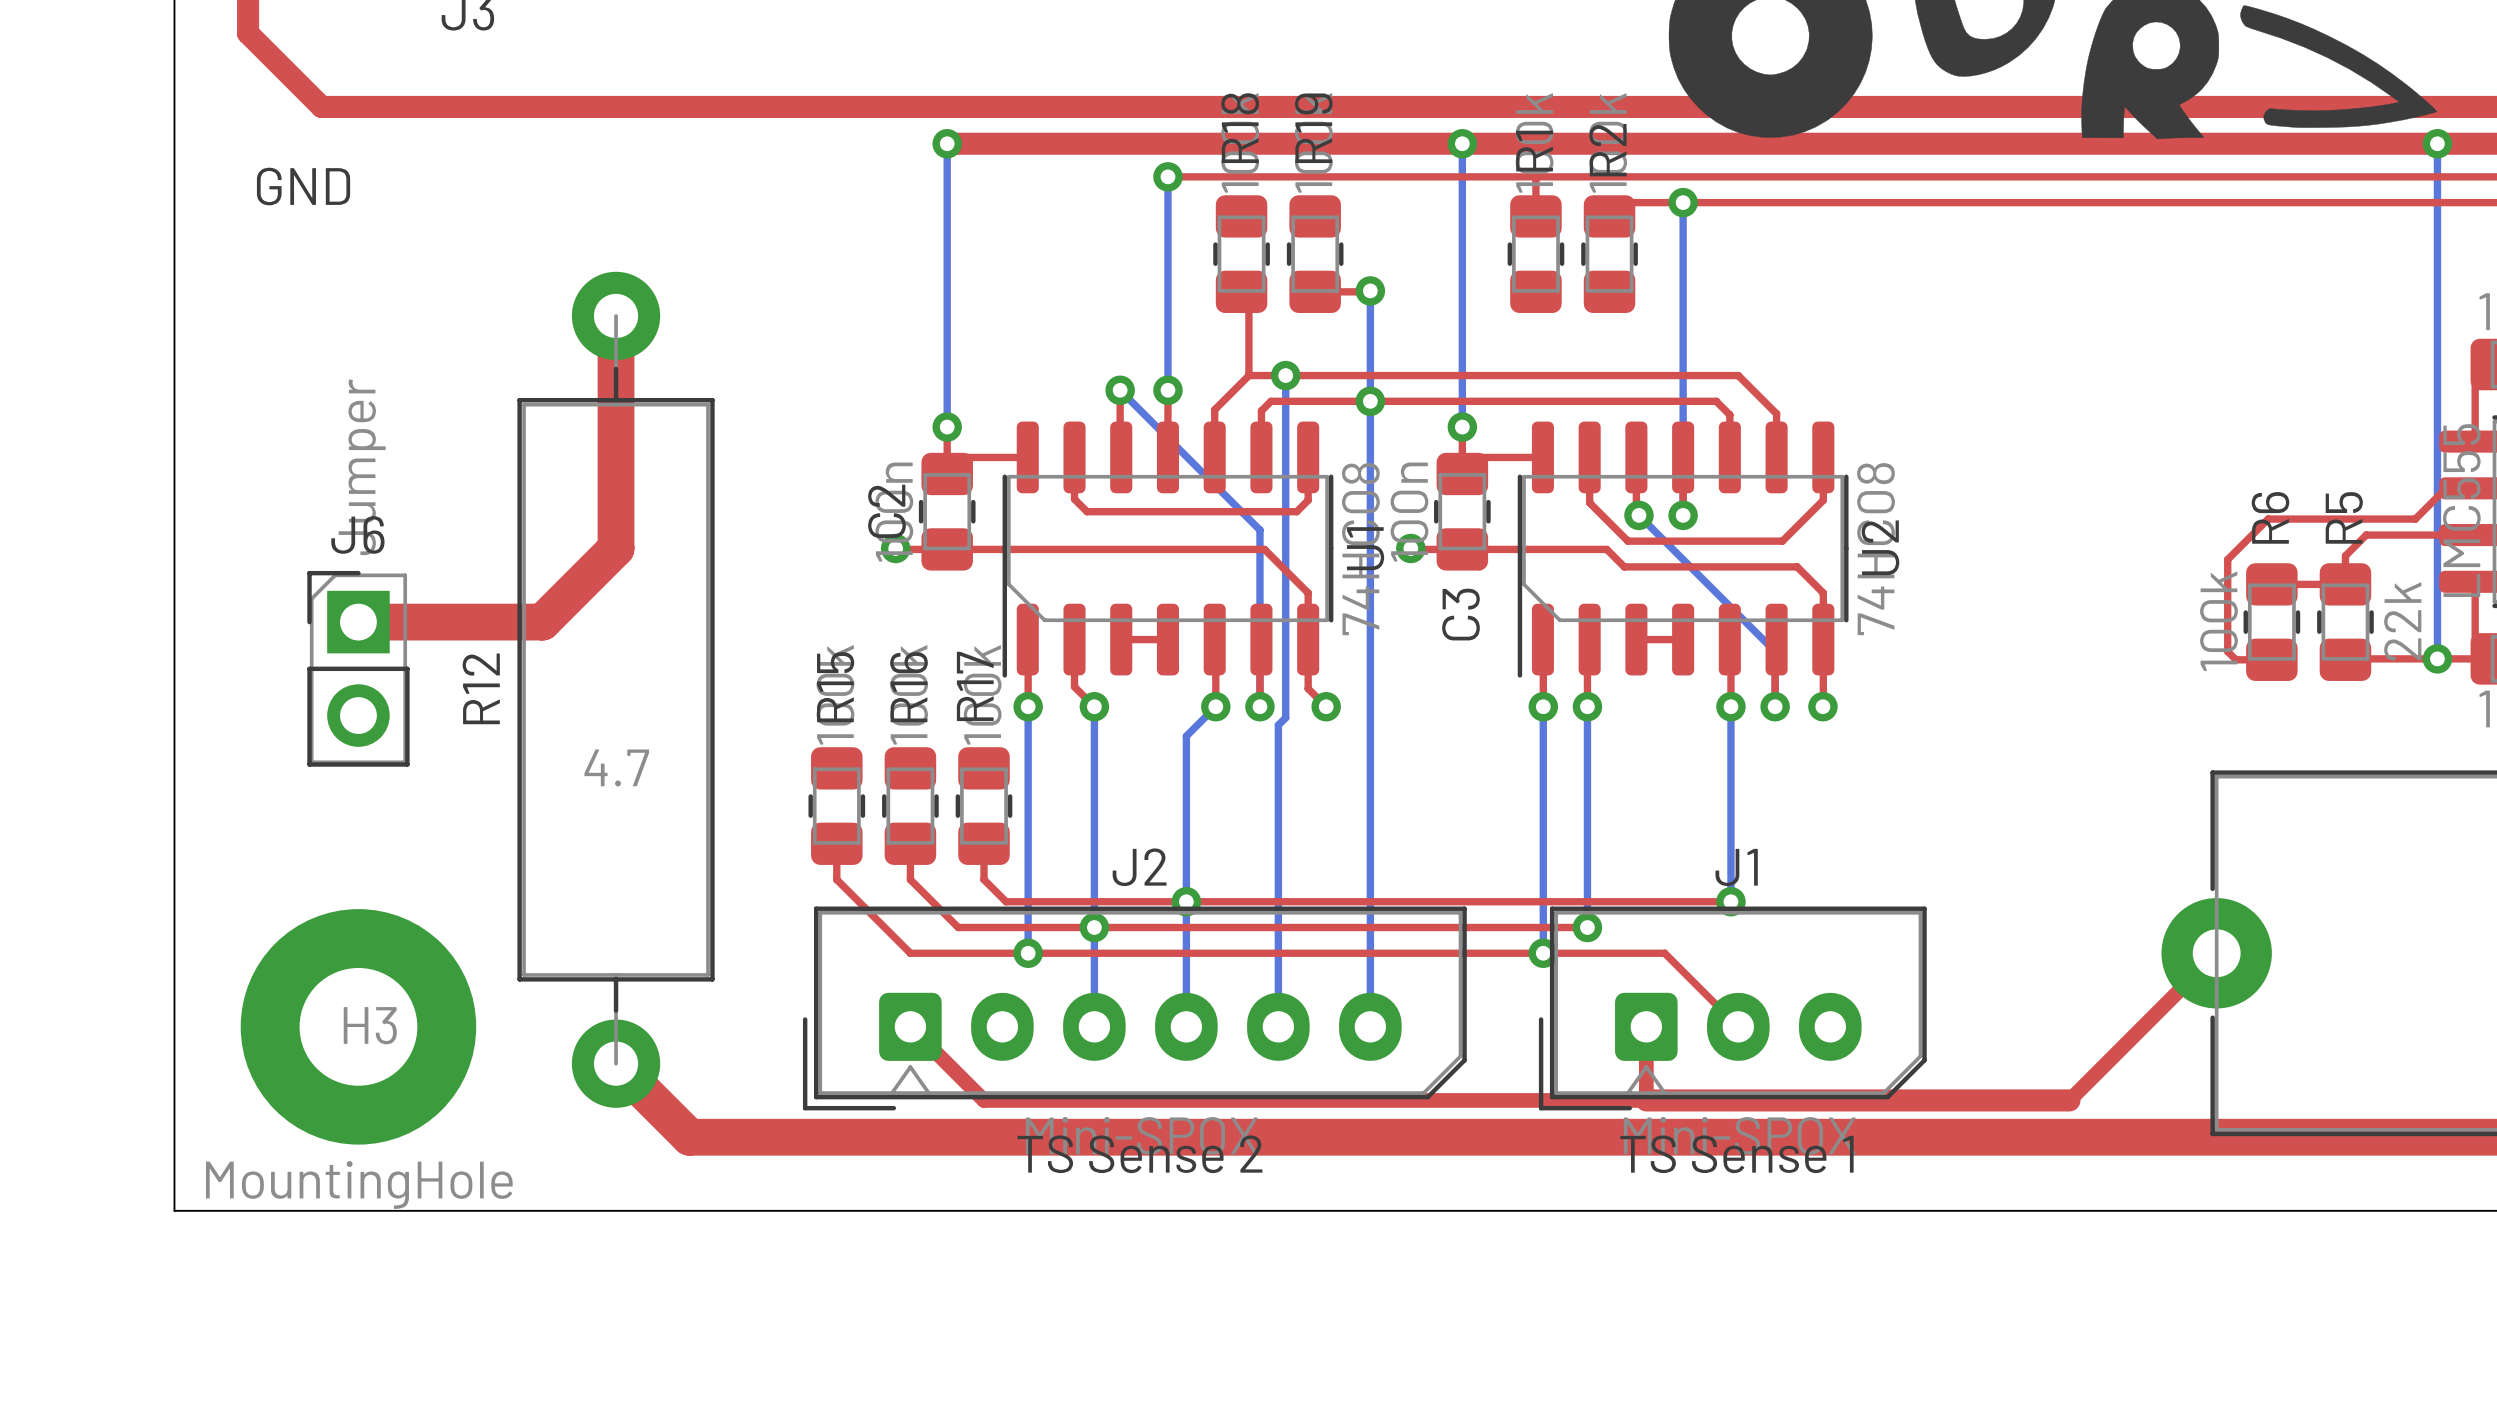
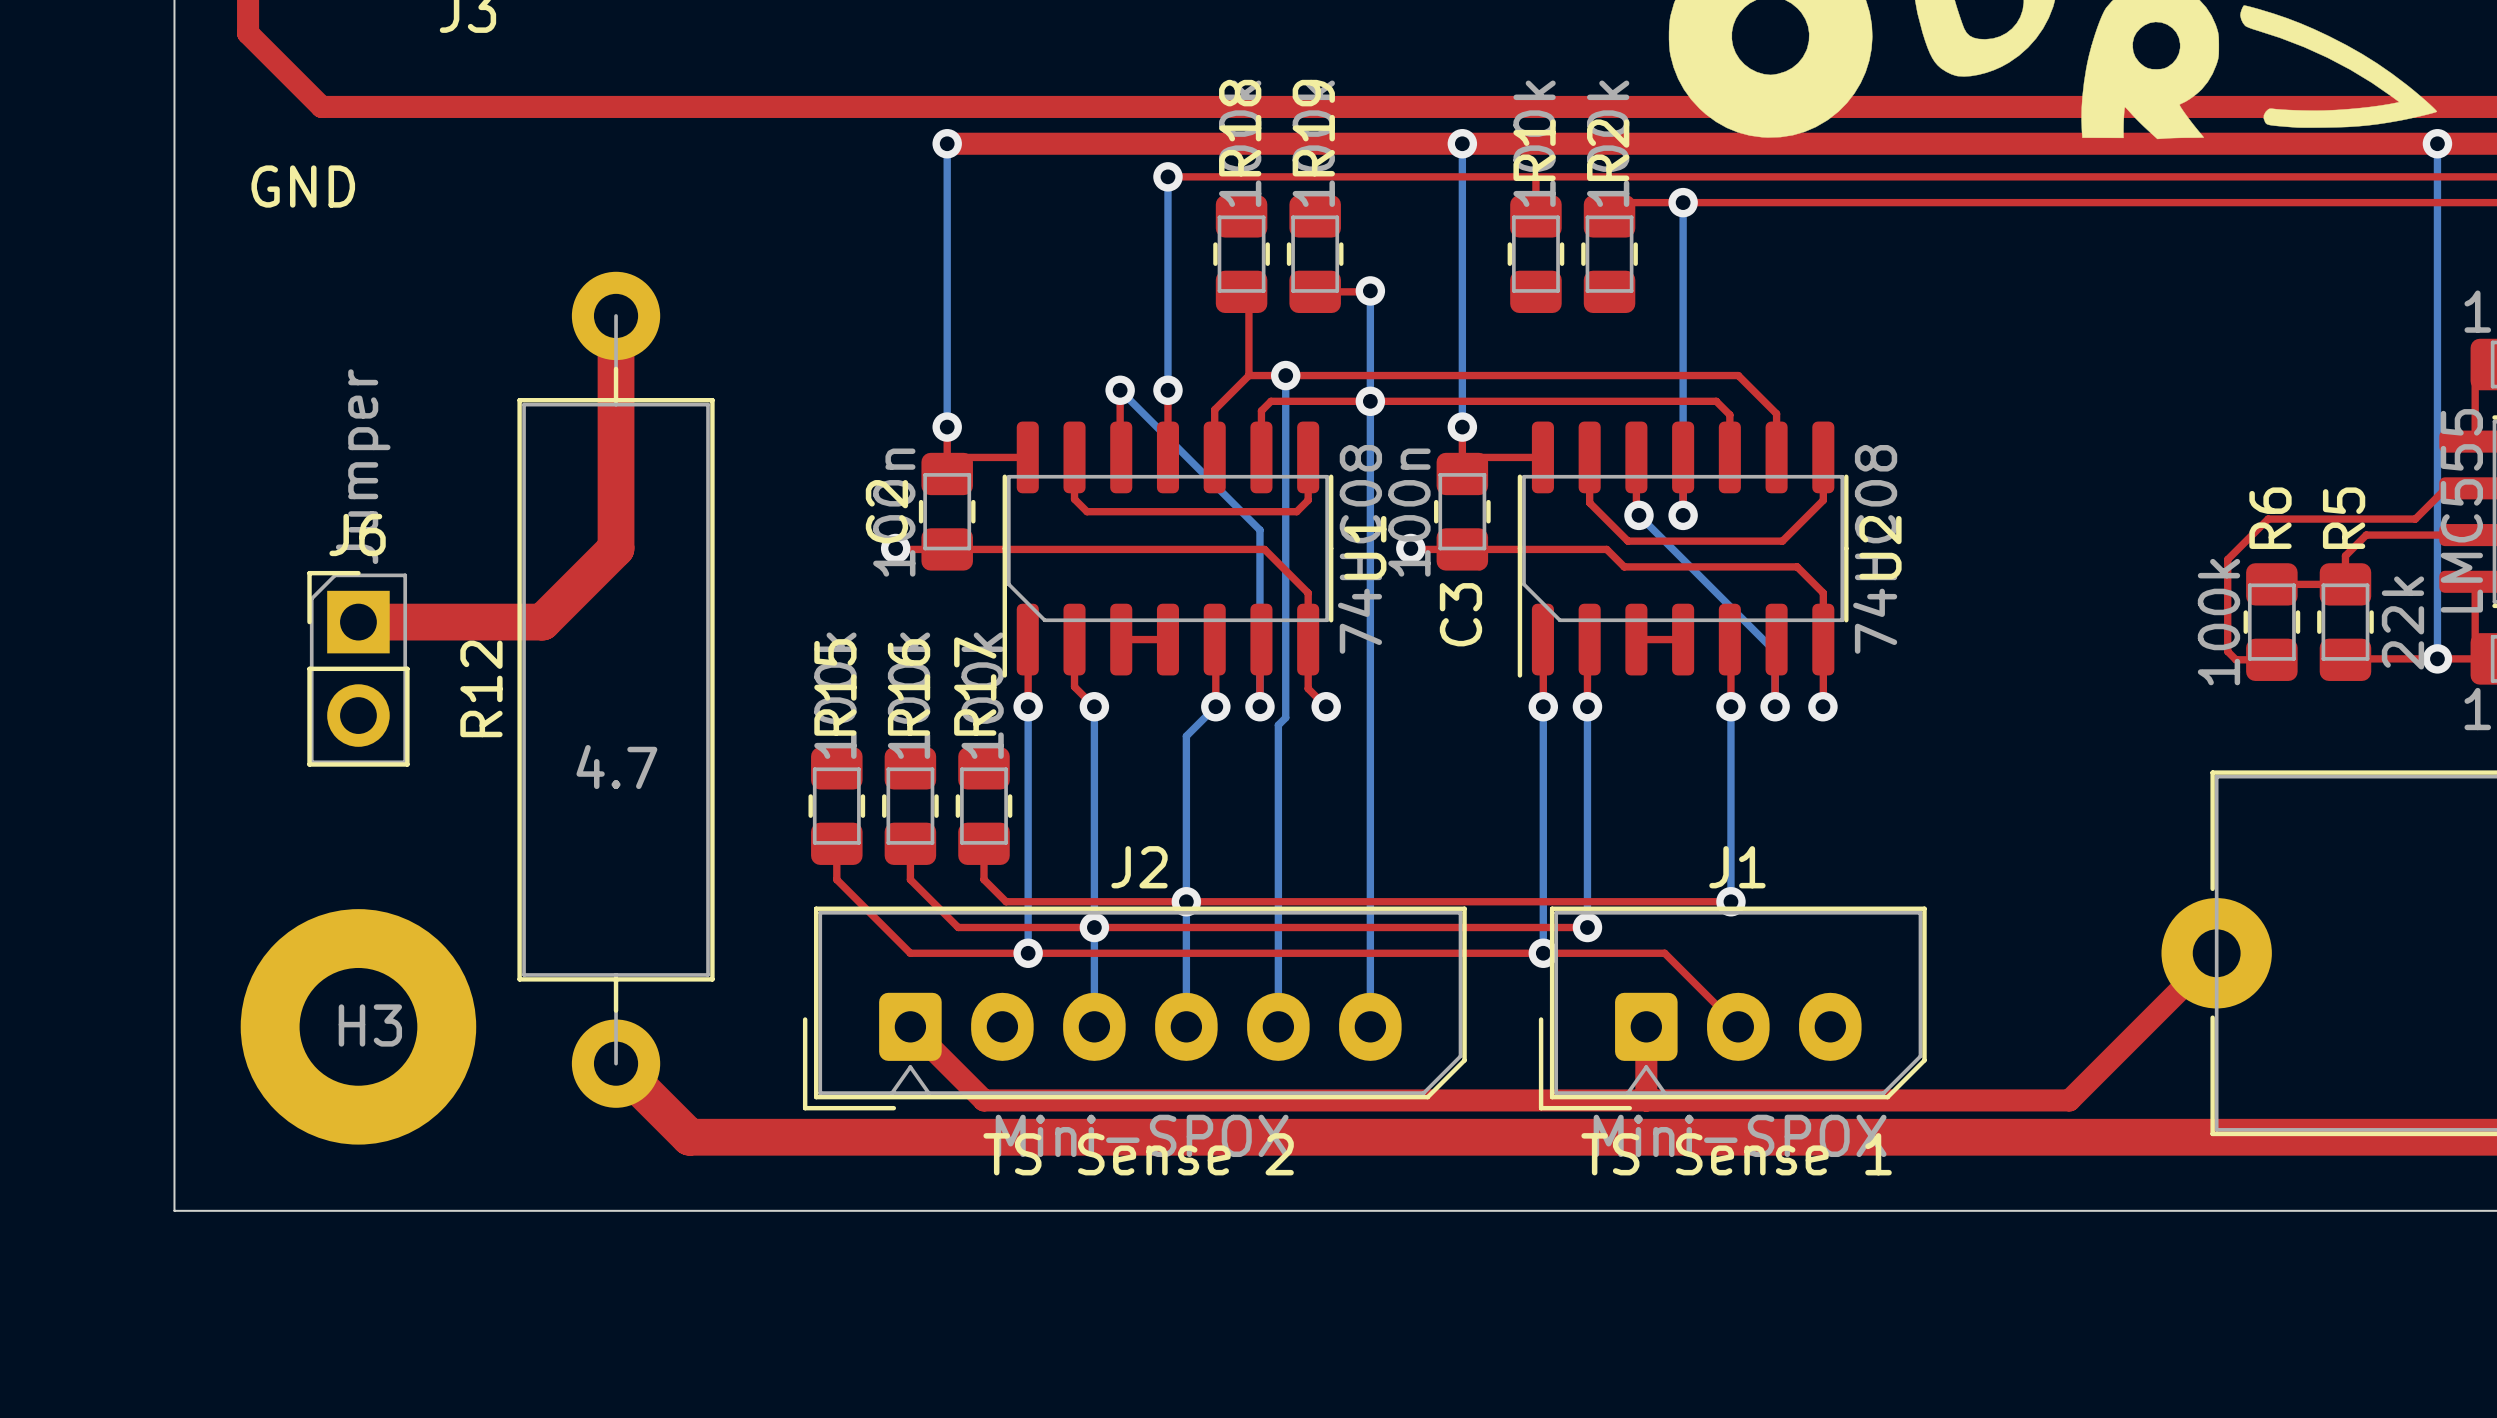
top track width: thin (2216, 953) (2069, 1100) -> thick (2216, 953) (2069, 1100)
top track width: thin (910, 1026) (983, 1100) (1646, 1100) (1646, 1026) -> thick (910, 1026) (983, 1100) (1646, 1100) (1646, 1026)
H3 value: MountingHole (359, 1184) -> none

